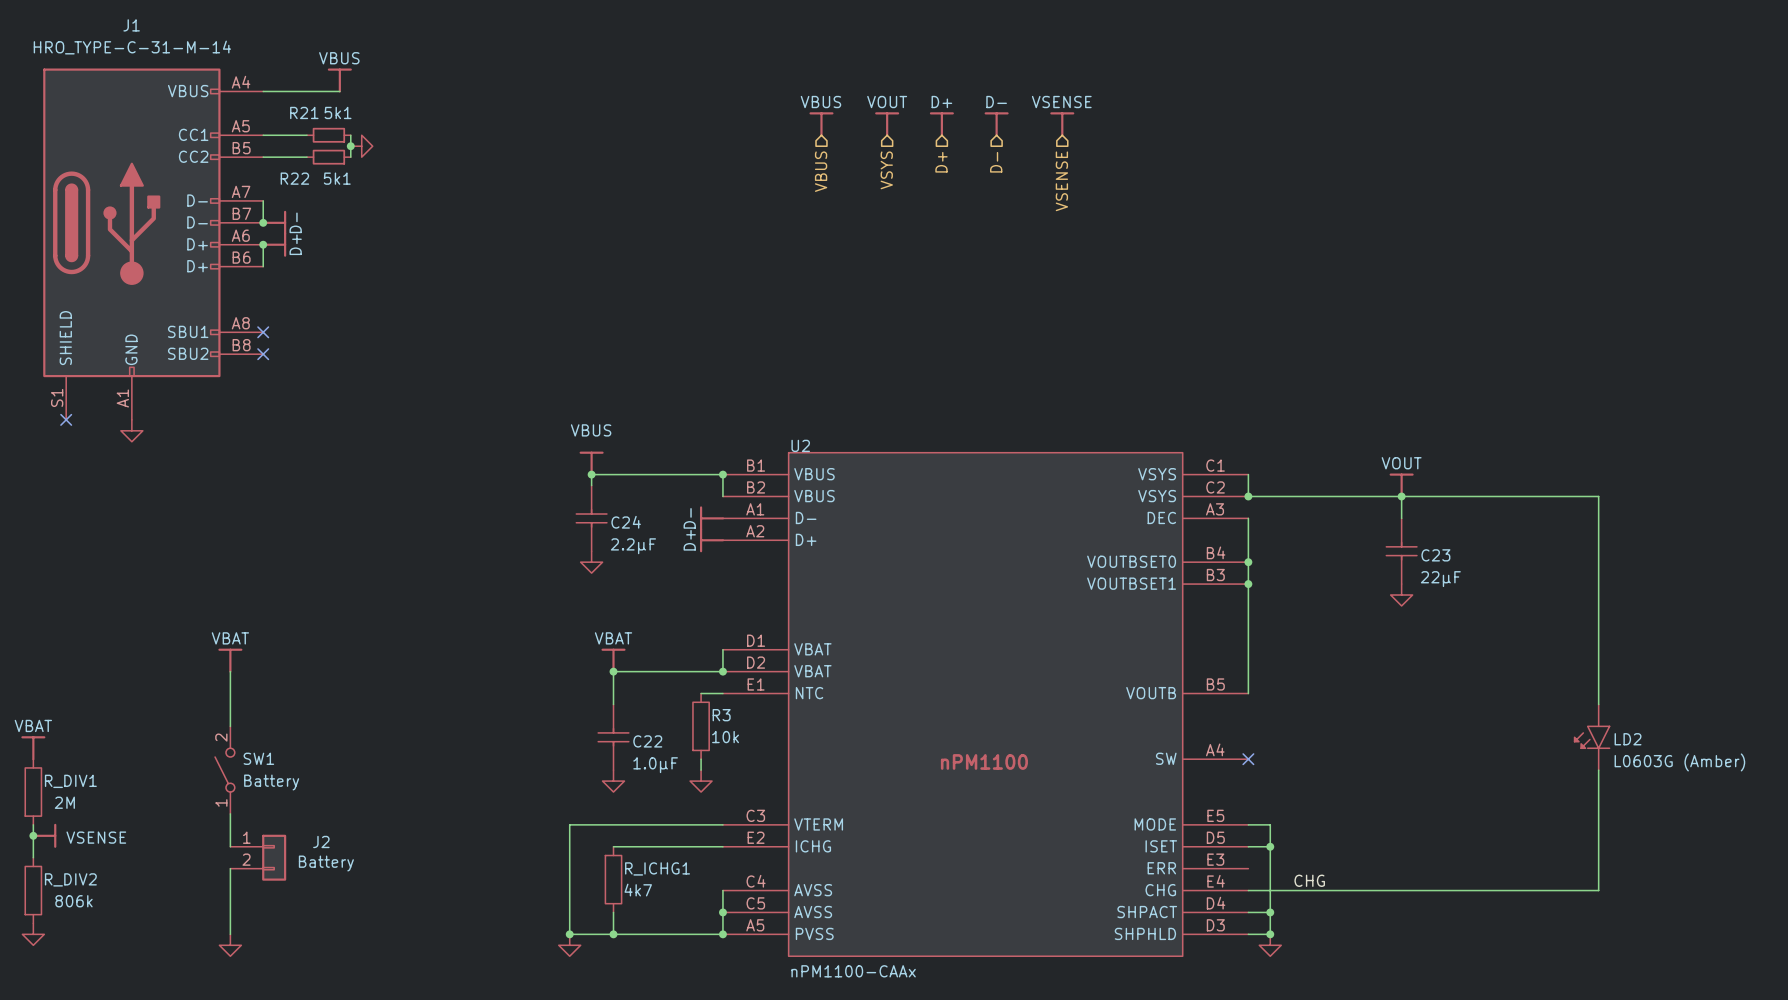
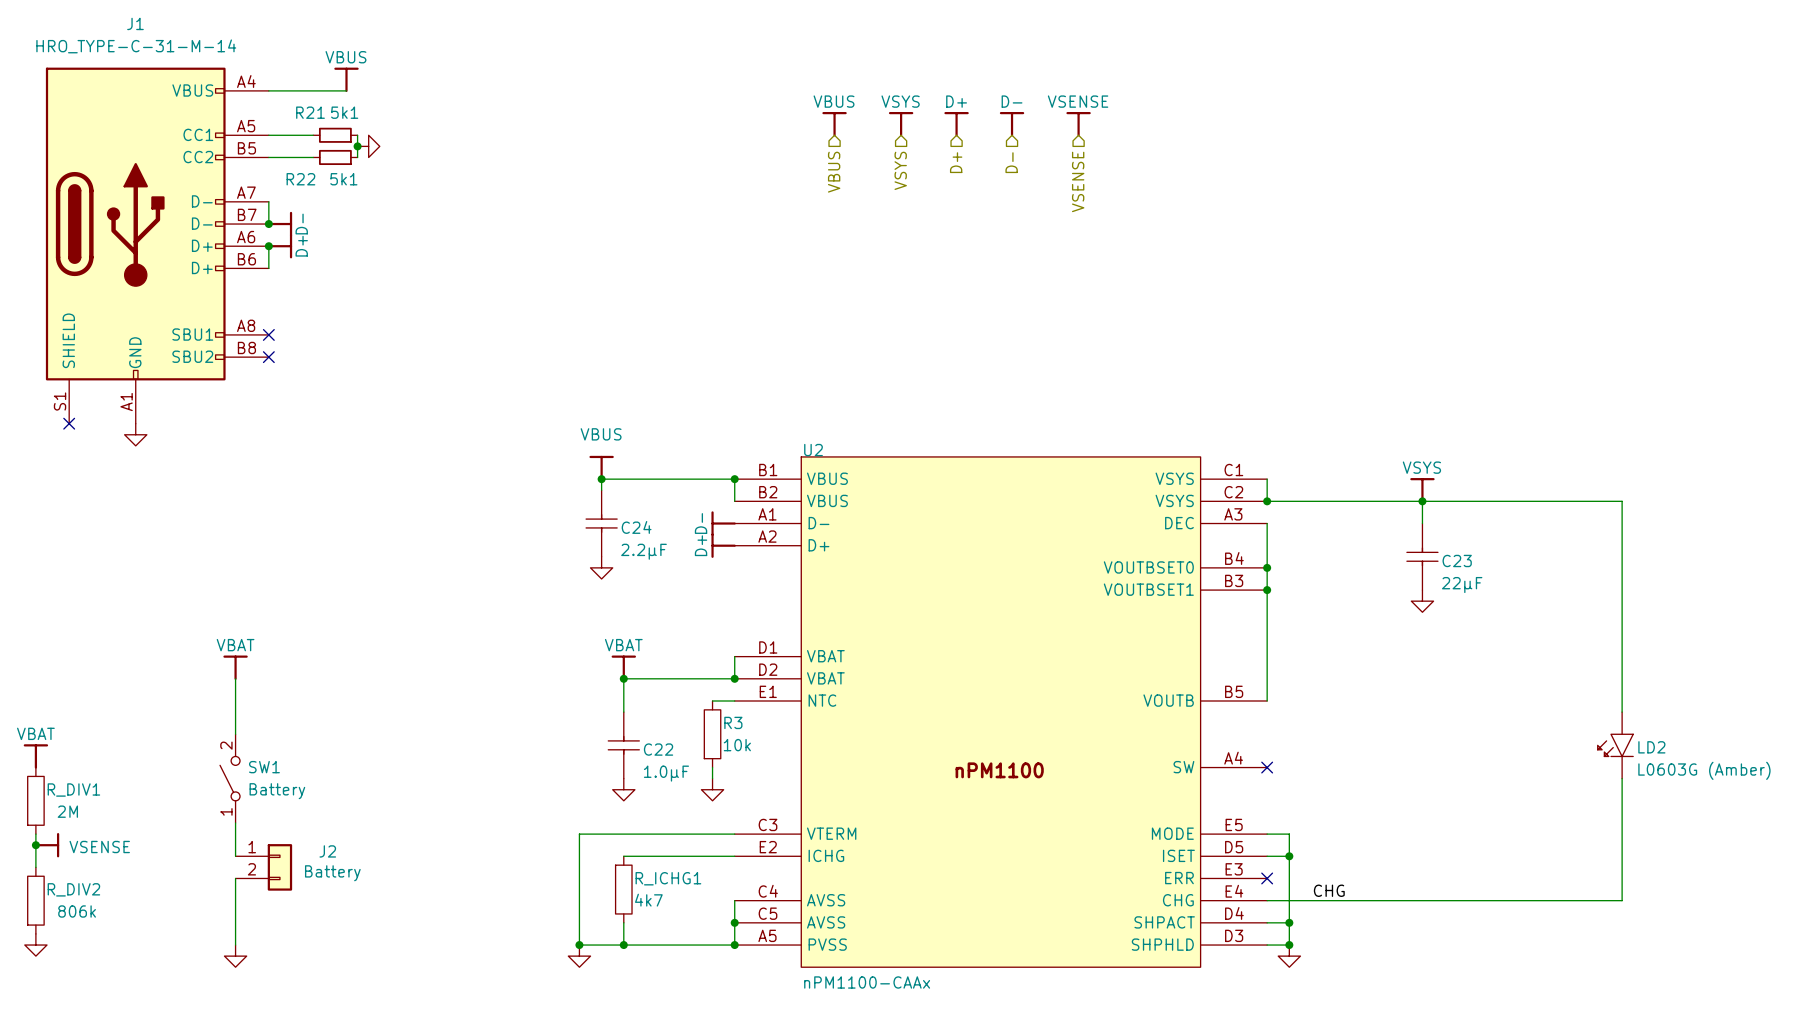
power symbol: VOUT (887, 124) -> VSYS (901, 124)
power symbol: VOUT (1401, 485) -> VSYS (1422, 490)
no-connect mark: none -> (1267, 878)

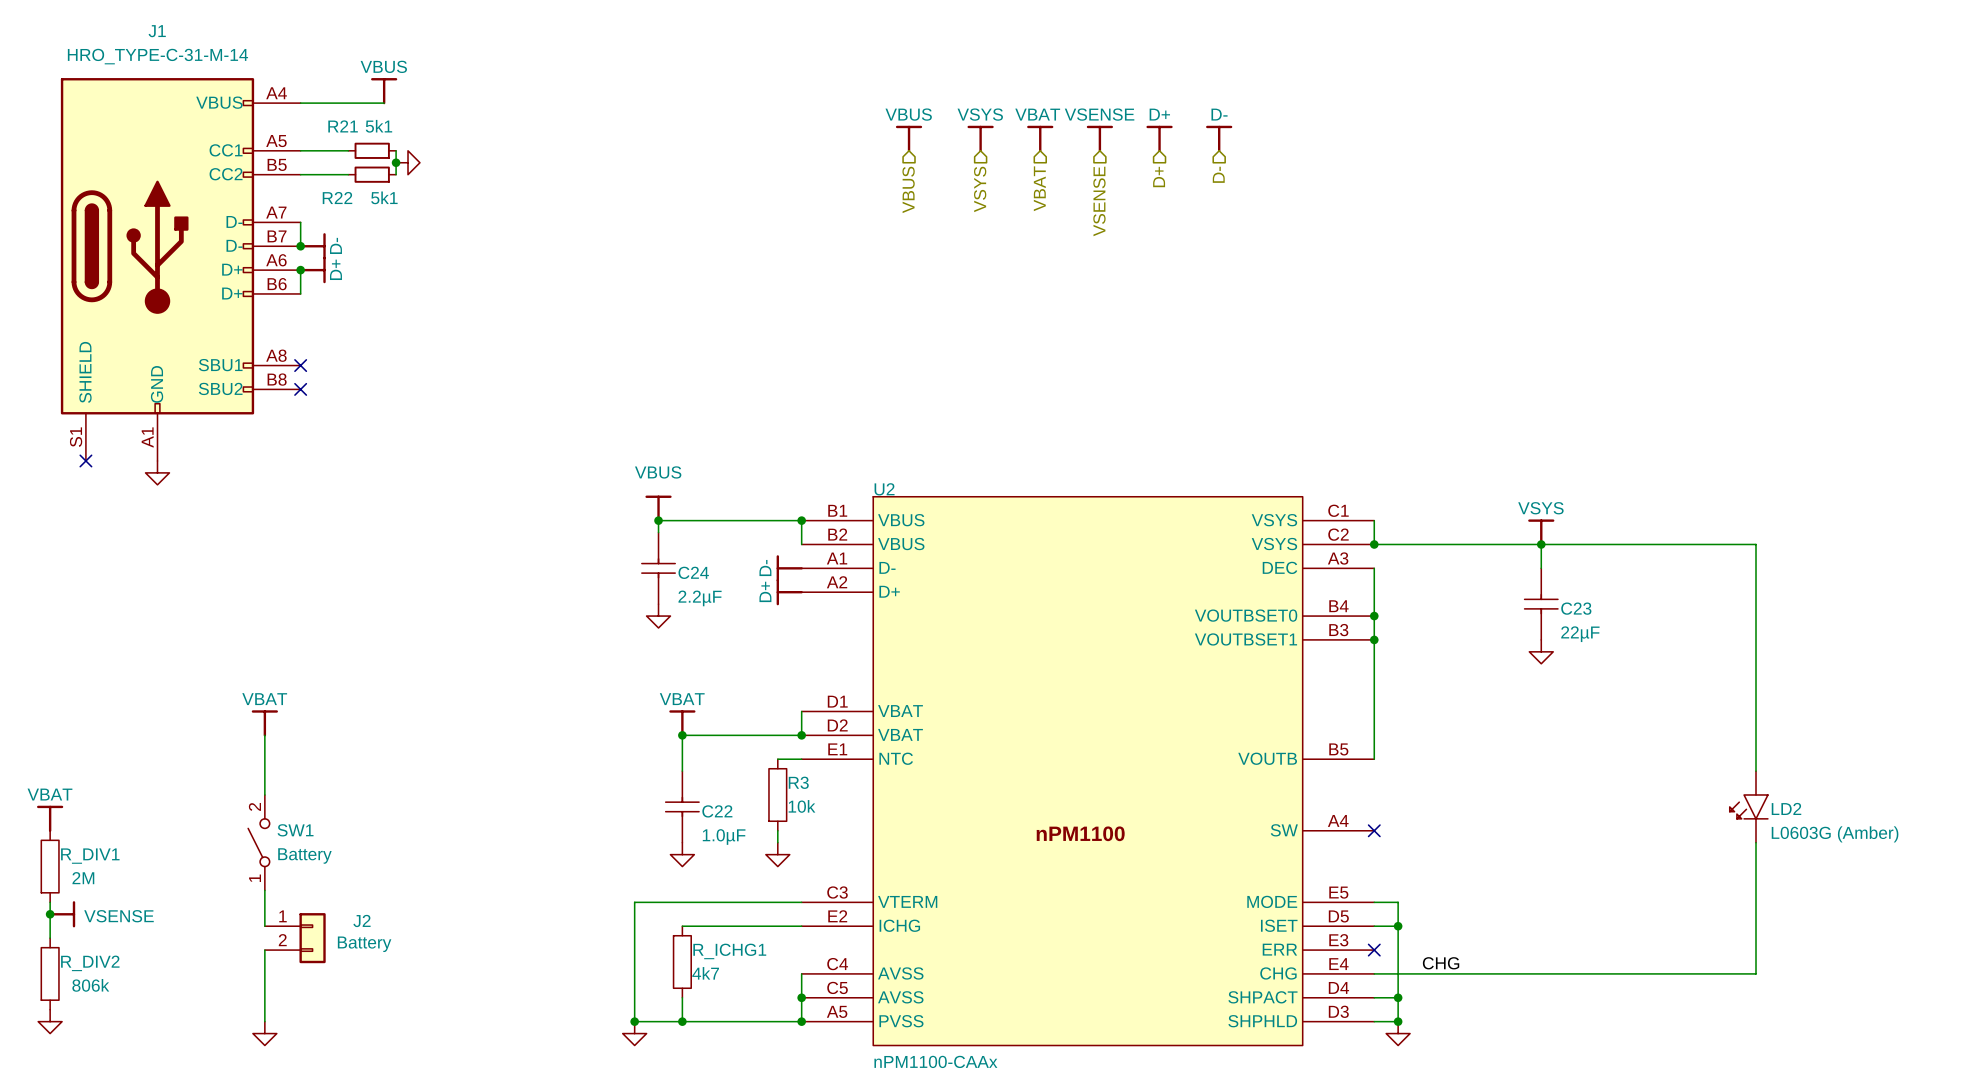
power symbol: D+ (956, 124) -> VBAT (1040, 138)
power symbol: D- (1012, 124) -> VSENSE (1099, 138)
power symbol: none -> D+ (1159, 138)
power symbol: VSENSE (1078, 124) -> none
power symbol: none -> D- (1219, 138)
hierarchical label: D+ (956, 162) -> VBAT (1039, 188)
hierarchical label: D- (1011, 162) -> VSENSE (1099, 201)
hierarchical label: none -> D+ (1159, 177)
hierarchical label: none -> D- (1218, 174)
hierarchical label: VSENSE (1078, 181) -> none

